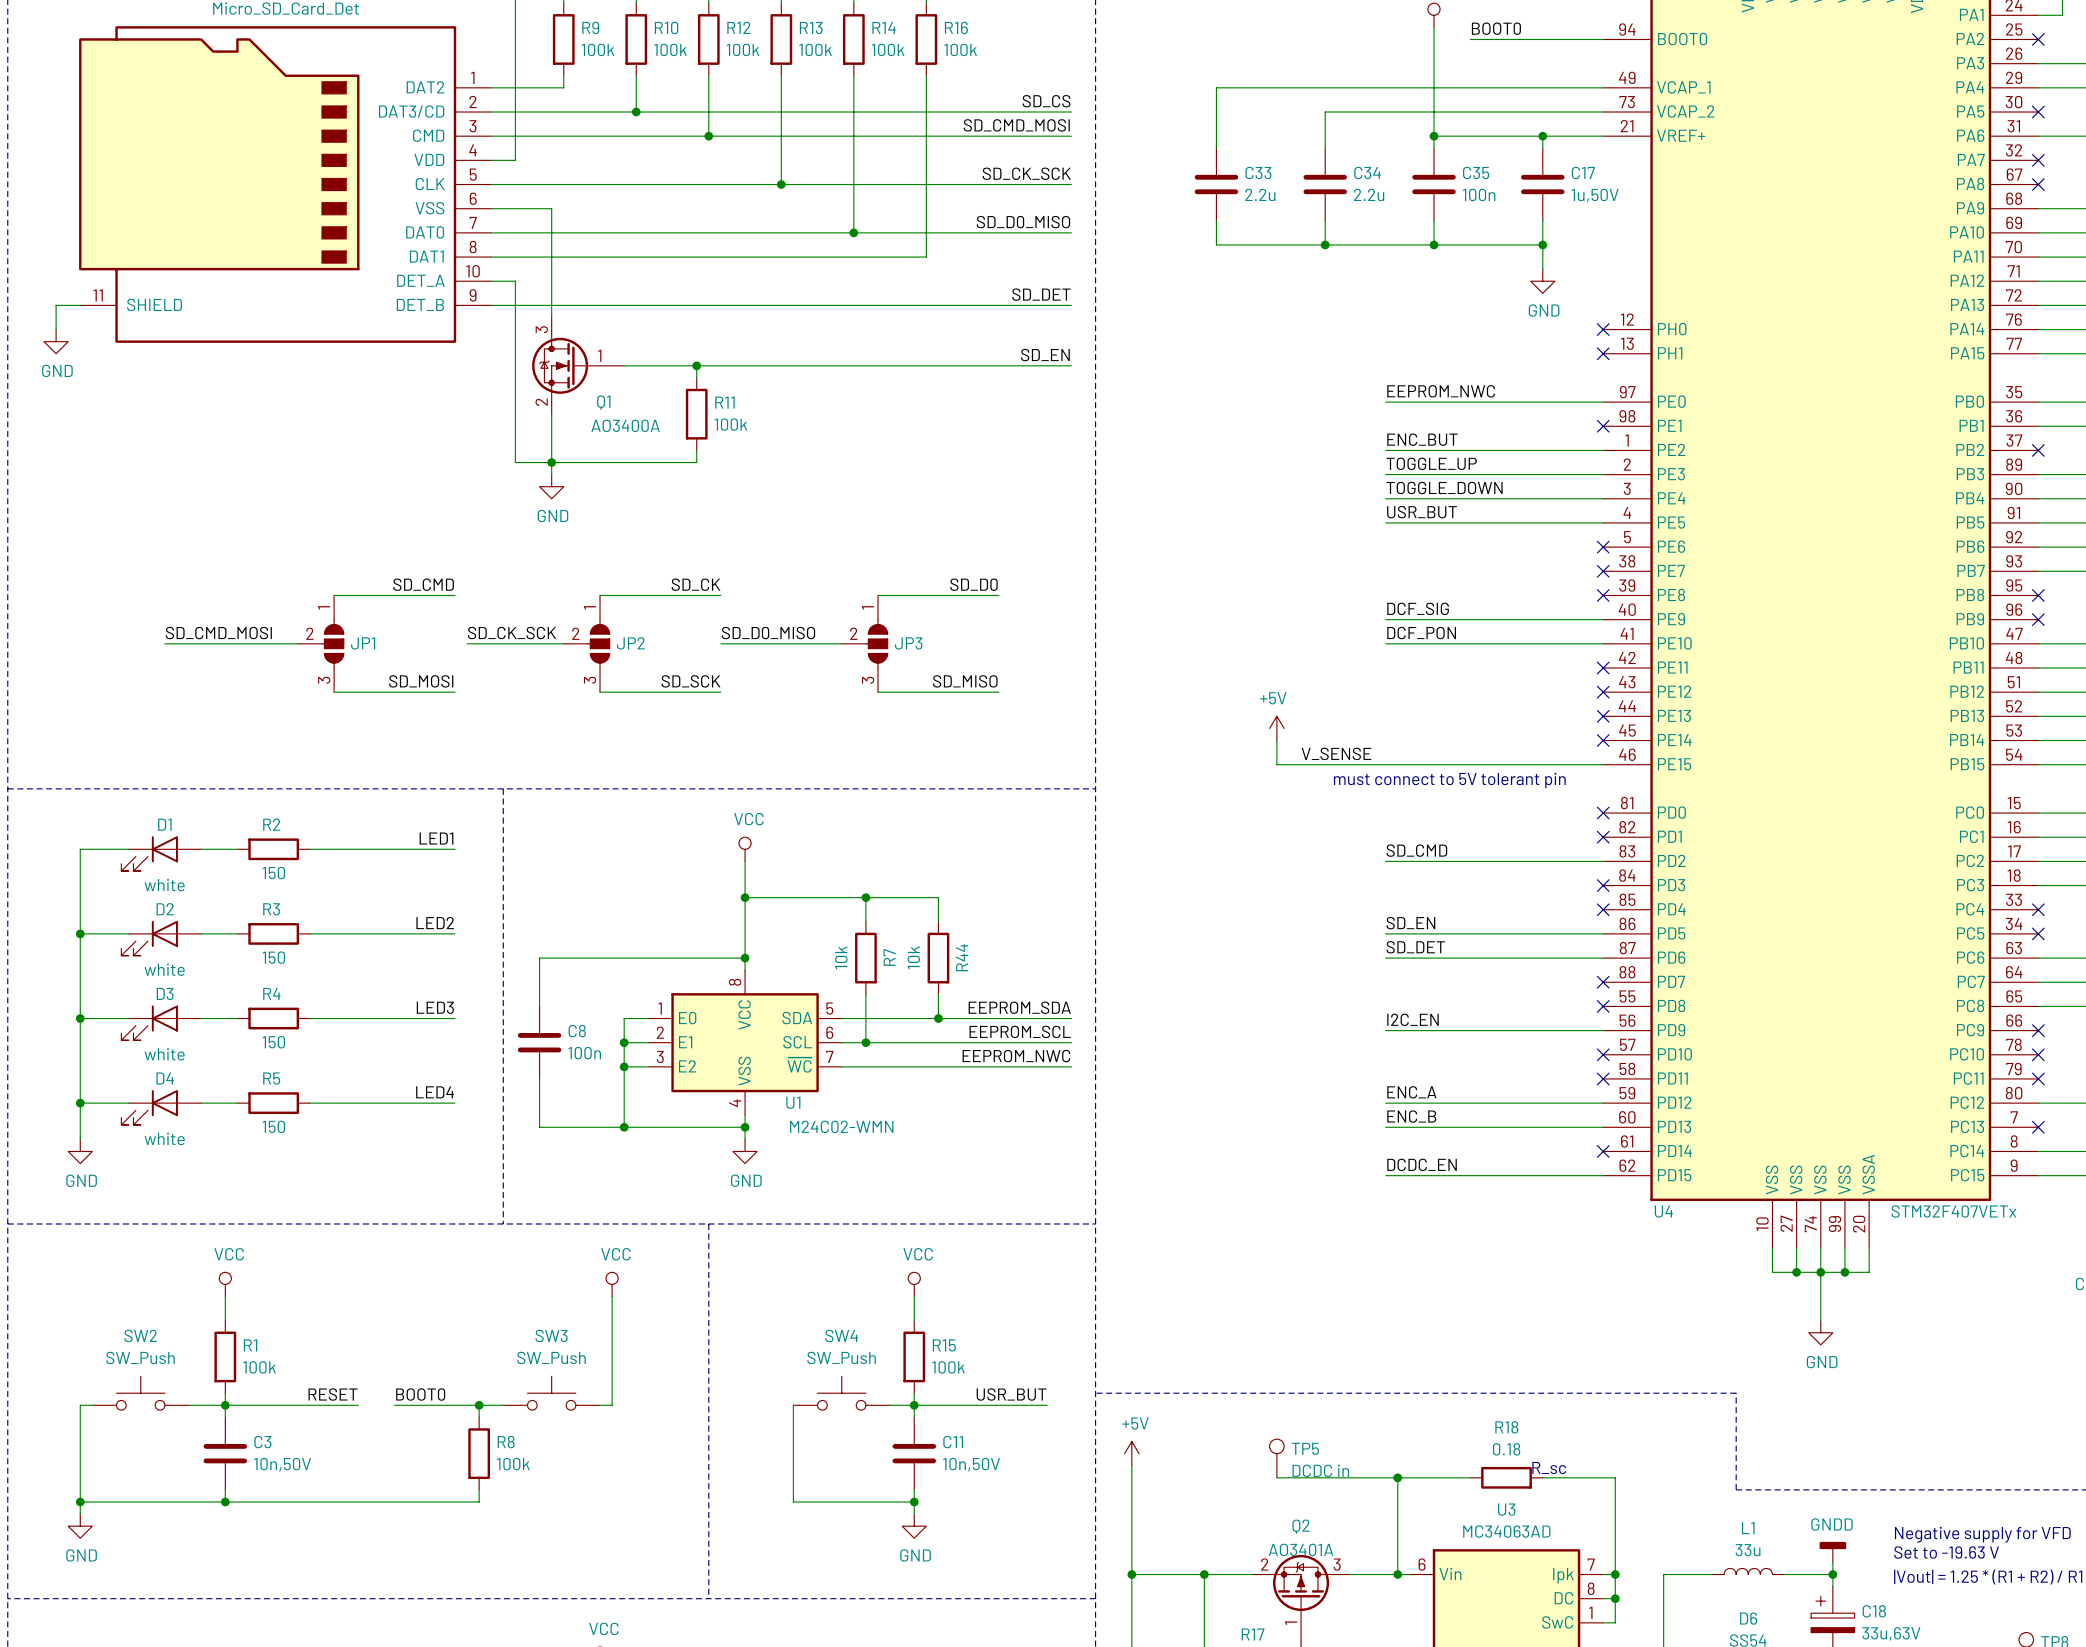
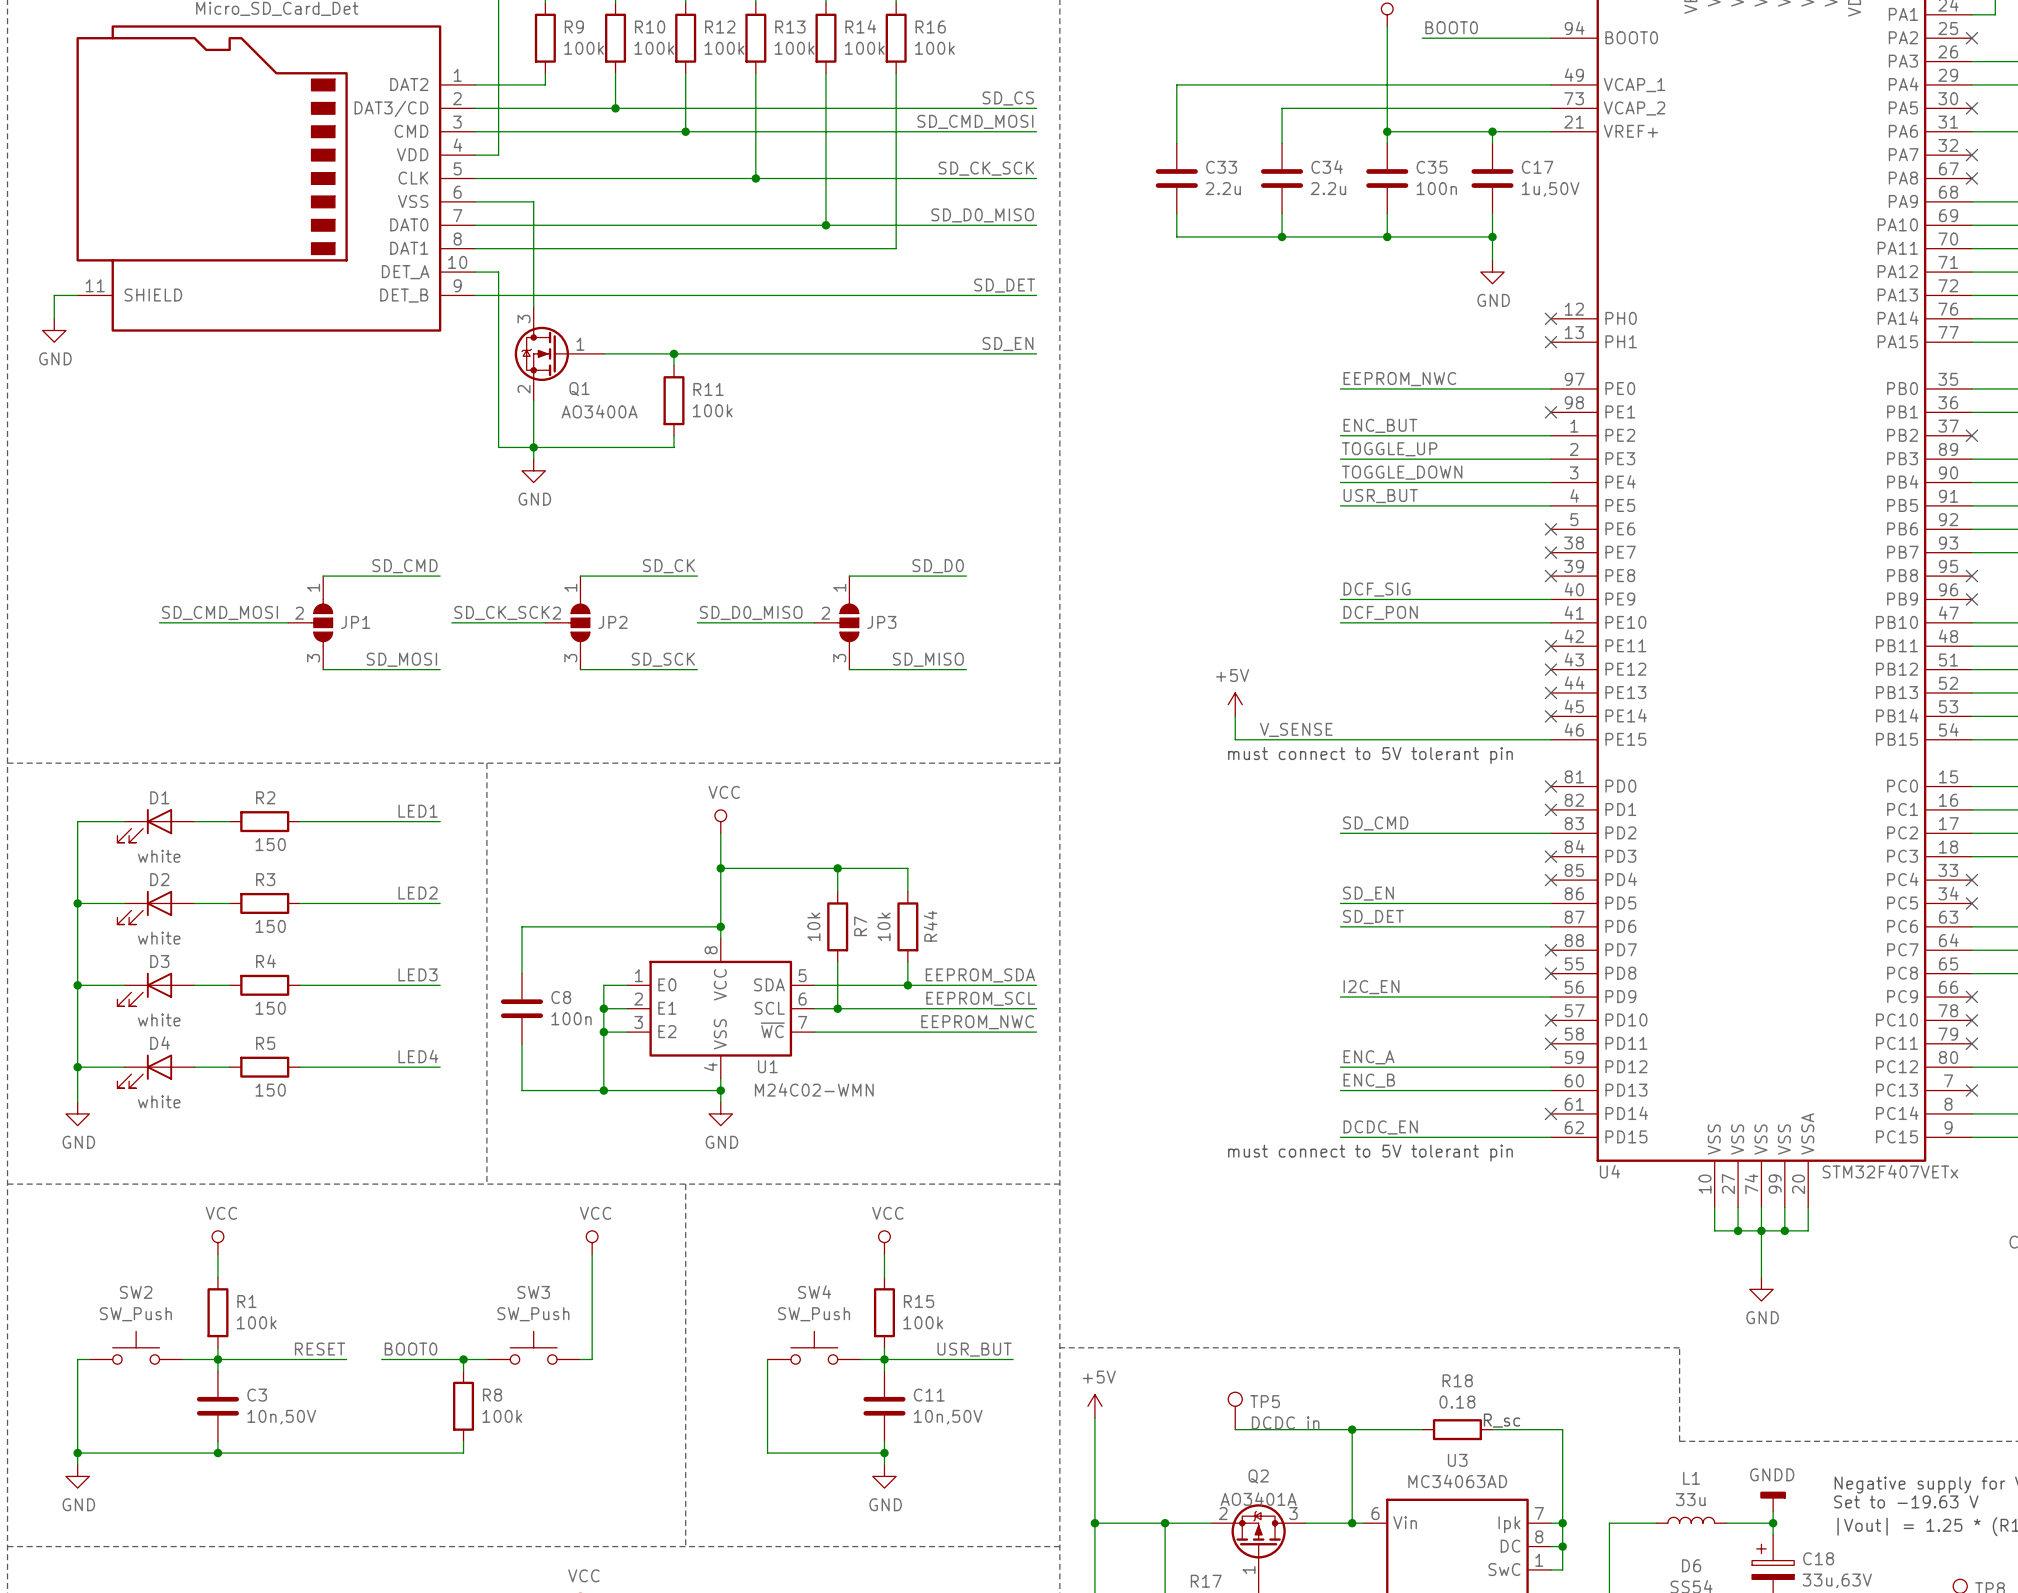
text: none -> must connect to 5V tolerant pin (1370, 1153)

